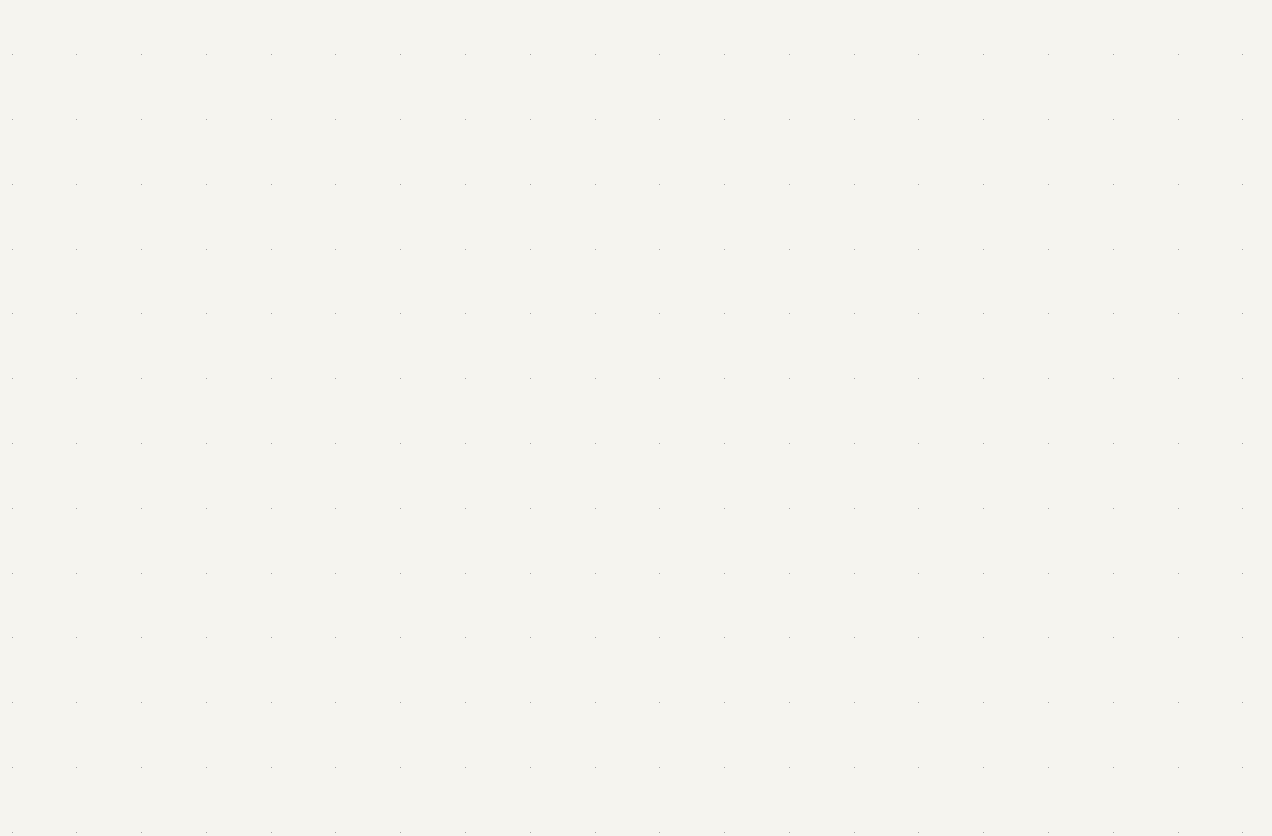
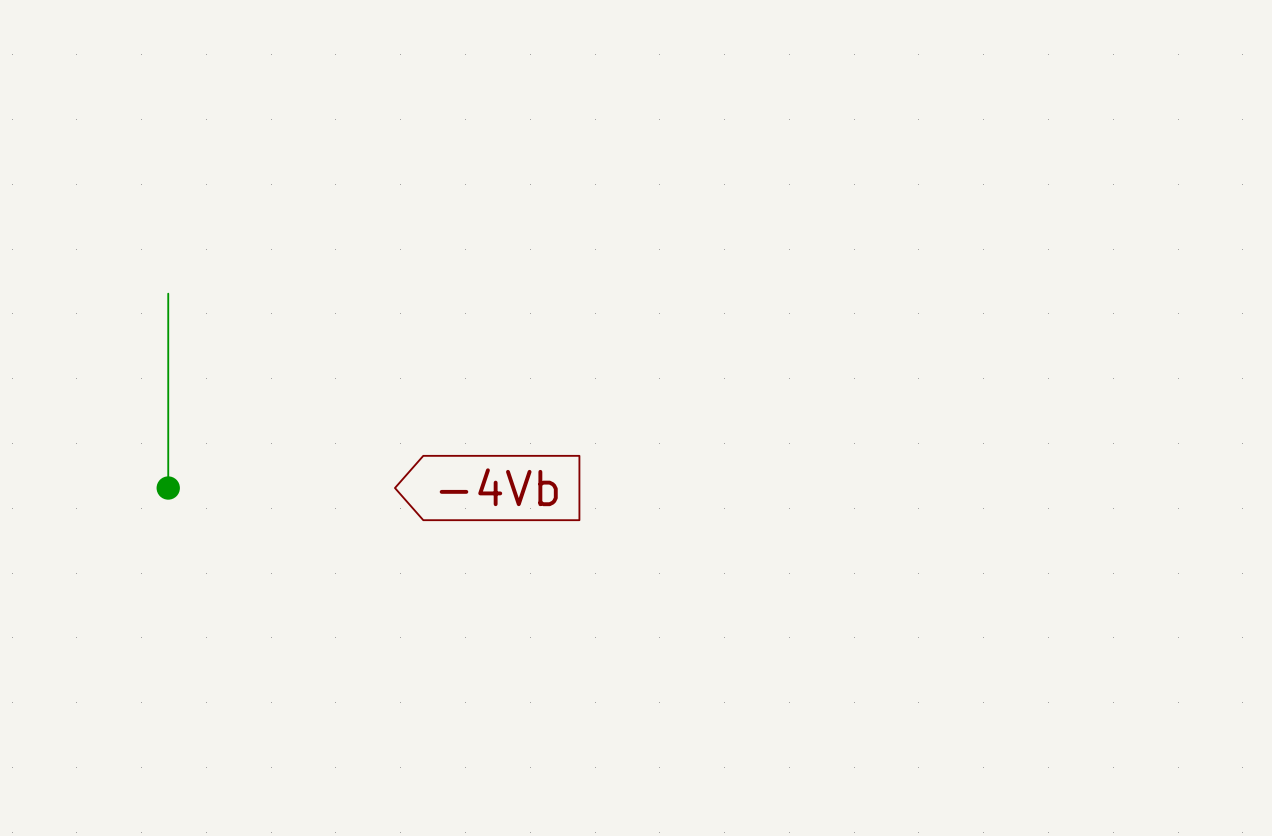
wire: none -> (168, 293) (168, 488)
global label: none -> -4Vb (498, 487)
junction: none -> (168, 488)

